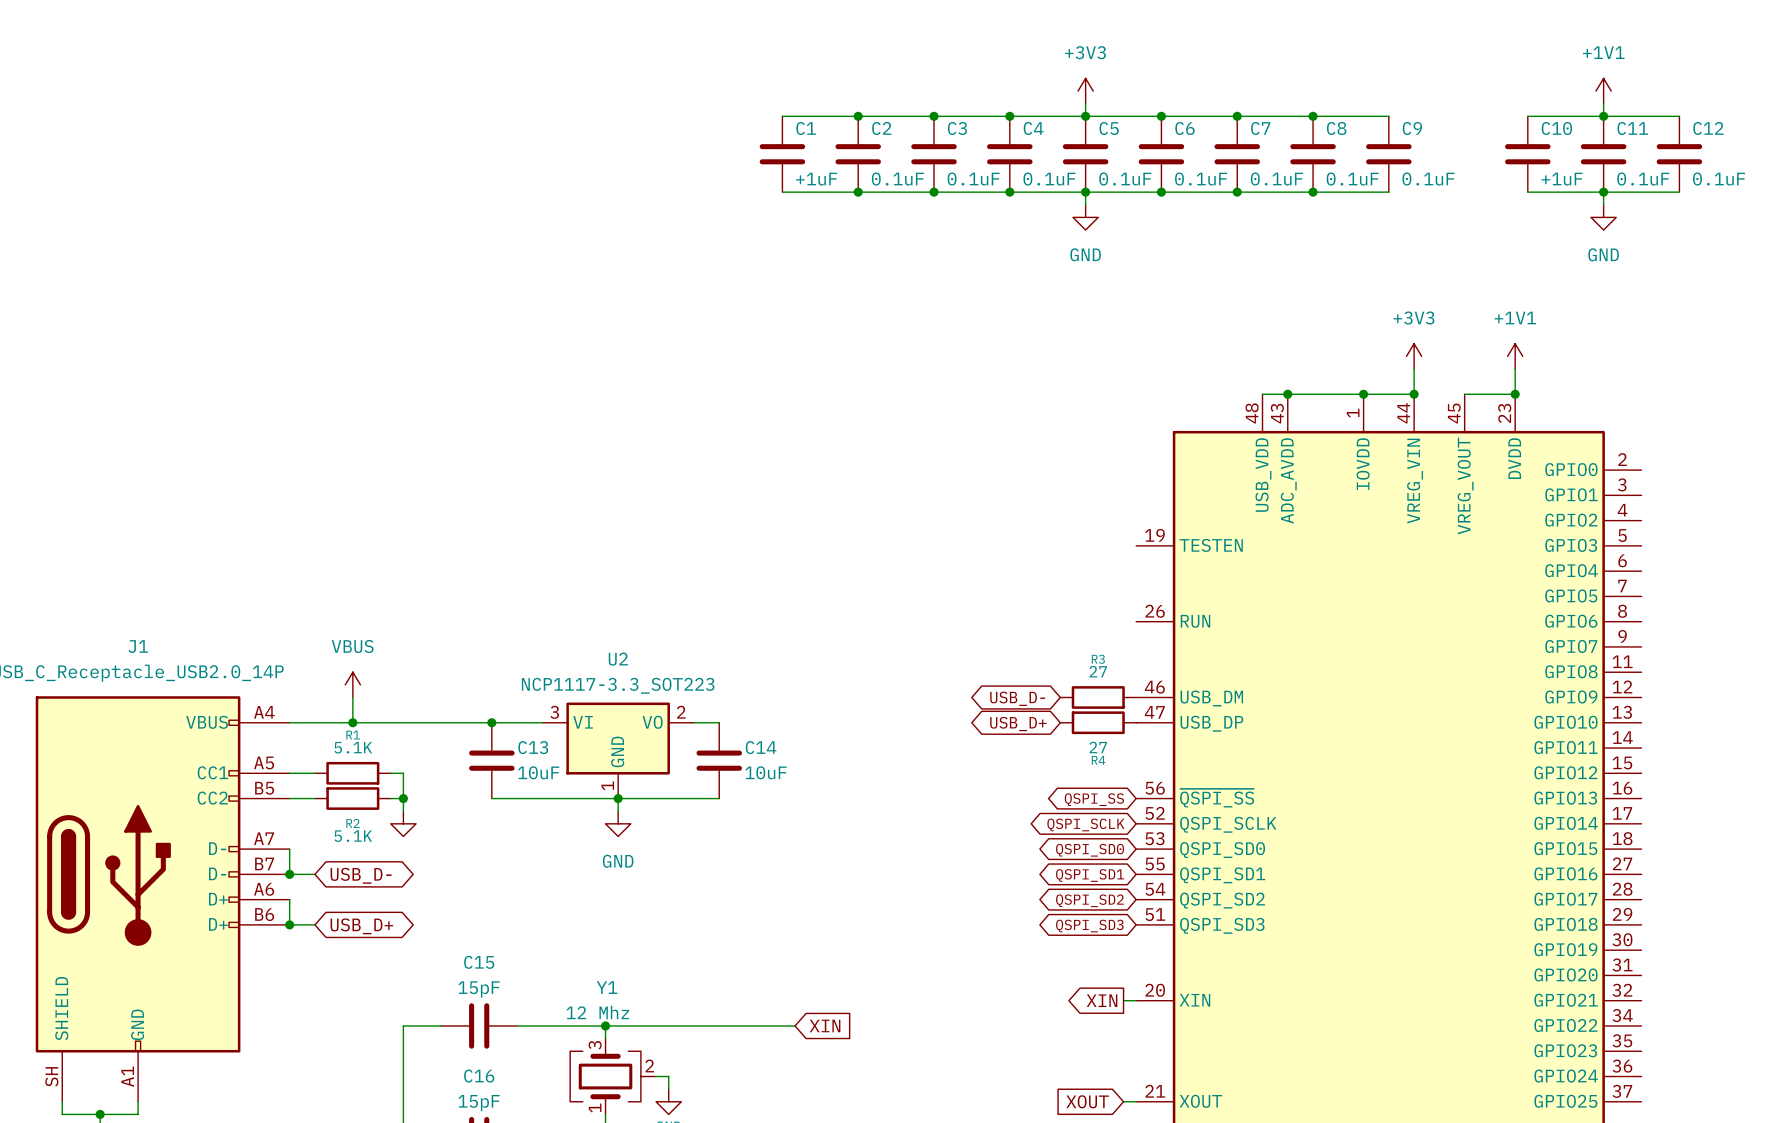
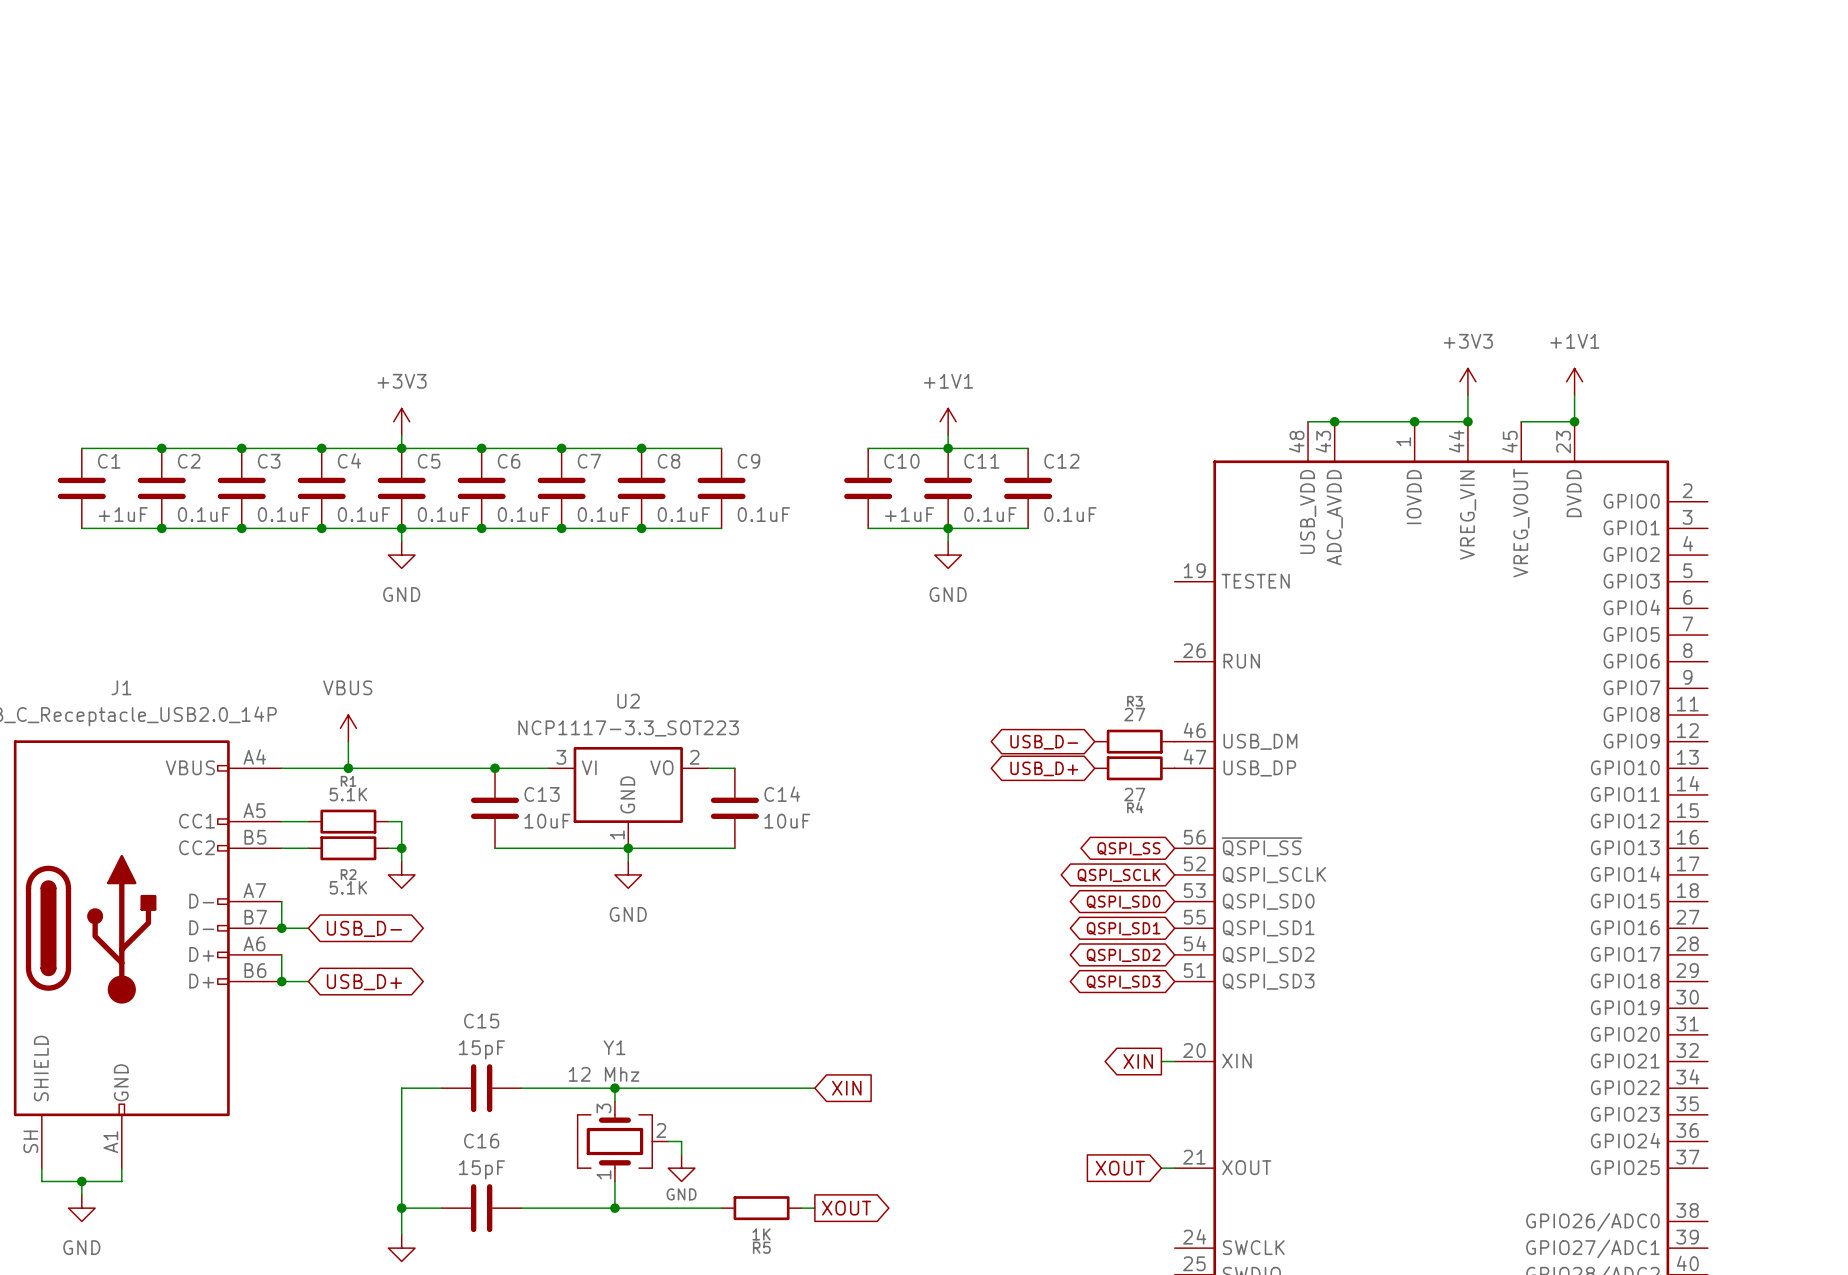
power symbol: +3V3 (1085, 91) -> none
power symbol: +1V1 (1603, 91) -> none
wire: (1085, 103) (1085, 116) -> none
wire: (1603, 103) (1603, 116) -> none
wire: (782, 116) (1388, 116) -> none
junction: (858, 116) -> none
junction: (934, 116) -> none
junction: (1009, 116) -> none
junction: (1085, 116) -> none
junction: (1161, 116) -> none
junction: (1237, 116) -> none
junction: (1313, 116) -> none
wire: (1527, 116) (1679, 116) -> none
junction: (1603, 116) -> none
C1 position: (782, 154) -> (81, 488)
C2 position: (858, 154) -> (161, 488)
C3 position: (934, 154) -> (241, 488)
C4 position: (1009, 154) -> (321, 488)
C5 position: (1085, 154) -> (401, 488)
C6 position: (1161, 154) -> (481, 488)
C7 position: (1237, 154) -> (561, 488)
C8 position: (1313, 154) -> (641, 488)
C9 position: (1388, 154) -> (721, 488)
C10 position: (1527, 154) -> (868, 488)
C11 position: (1603, 154) -> (948, 488)
C12 position: (1679, 154) -> (1028, 488)
wire: (782, 192) (1388, 192) -> none
junction: (858, 192) -> none
junction: (934, 192) -> none
junction: (1009, 192) -> none
wire: (1085, 192) (1085, 204) -> none
junction: (1085, 192) -> none
junction: (1161, 192) -> none
junction: (1237, 192) -> none
junction: (1313, 192) -> none
wire: (1527, 192) (1679, 192) -> none
wire: (1603, 192) (1603, 204) -> none
junction: (1603, 192) -> none
power symbol: GND (1085, 217) -> none
power symbol: GND (1603, 217) -> none
power symbol: none -> +3V3 (401, 421)
power symbol: none -> +1V1 (948, 421)
wire: none -> (401, 435) (401, 448)
wire: none -> (948, 435) (948, 448)
wire: none -> (81, 448) (721, 448)
junction: none -> (161, 448)
junction: none -> (241, 448)
junction: none -> (321, 448)
junction: none -> (401, 448)
junction: none -> (481, 448)
junction: none -> (561, 448)
junction: none -> (641, 448)
wire: none -> (868, 448) (1028, 448)
junction: none -> (948, 448)
wire: none -> (81, 528) (721, 528)
junction: none -> (161, 528)
junction: none -> (241, 528)
junction: none -> (321, 528)
wire: none -> (401, 528) (401, 541)
junction: none -> (401, 528)
junction: none -> (481, 528)
junction: none -> (561, 528)
junction: none -> (641, 528)
wire: none -> (868, 528) (1028, 528)
wire: none -> (948, 528) (948, 541)
junction: none -> (948, 528)
power symbol: none -> GND (401, 555)
power symbol: none -> GND (948, 555)

